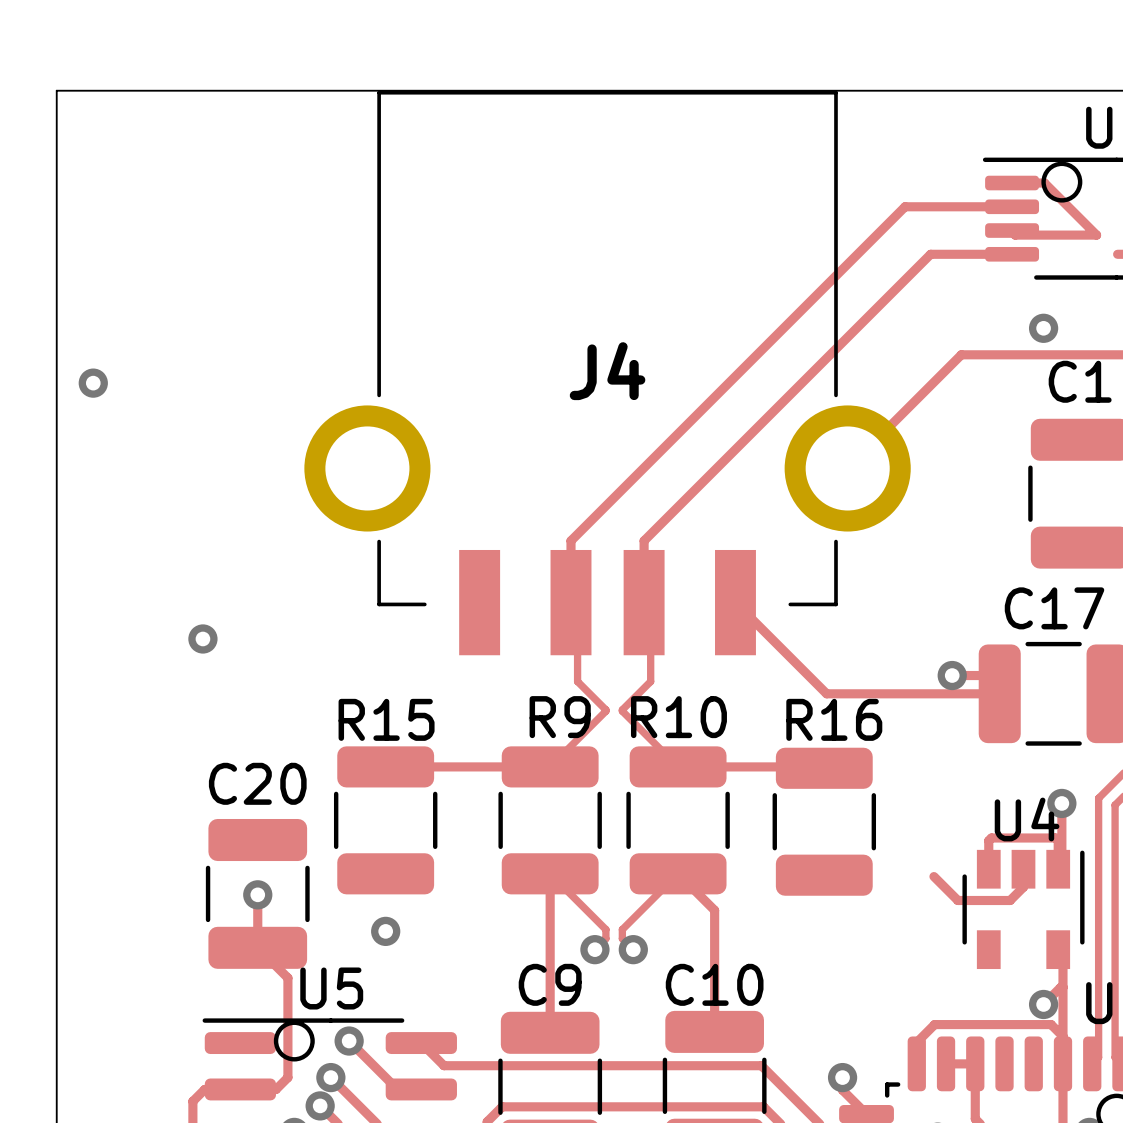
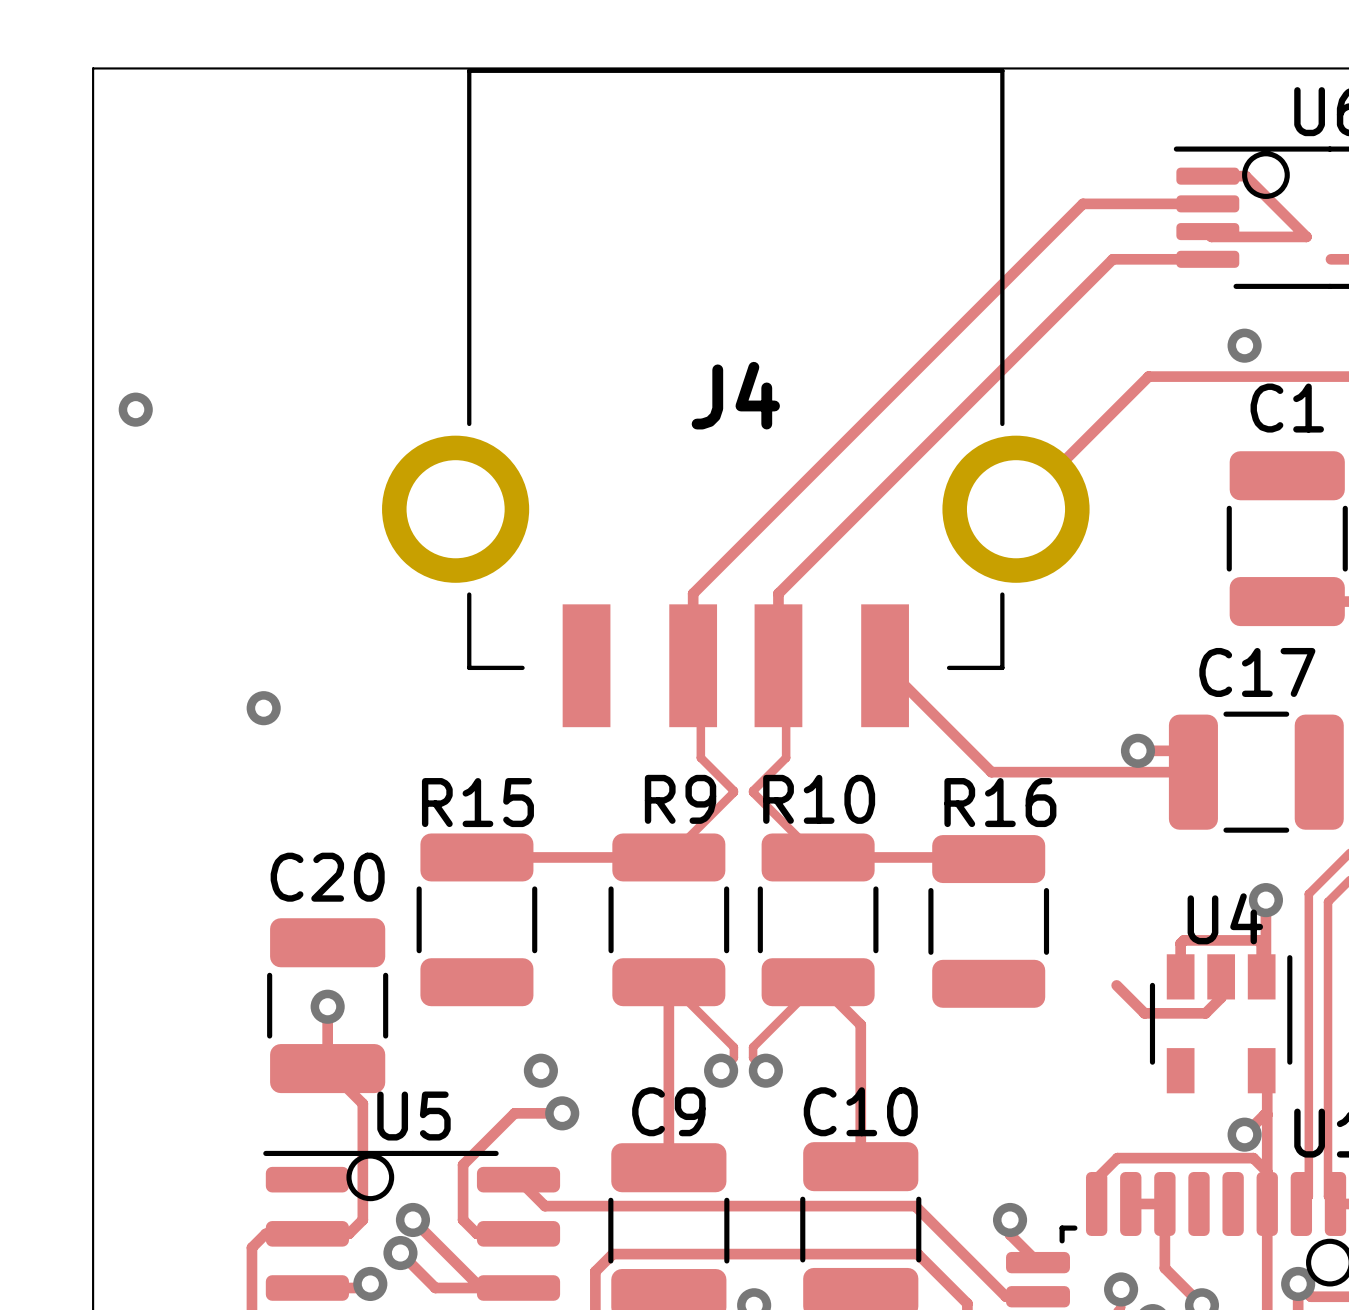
via: (385, 931) -> none
via: none -> (540, 1070)
via: none -> (562, 1113)
track: (349, 1041) (397, 1089) -> (562, 1113) (514, 1113) (463, 1164) (463, 1219) (476, 1233) (490, 1233)
via: (349, 1041) -> none

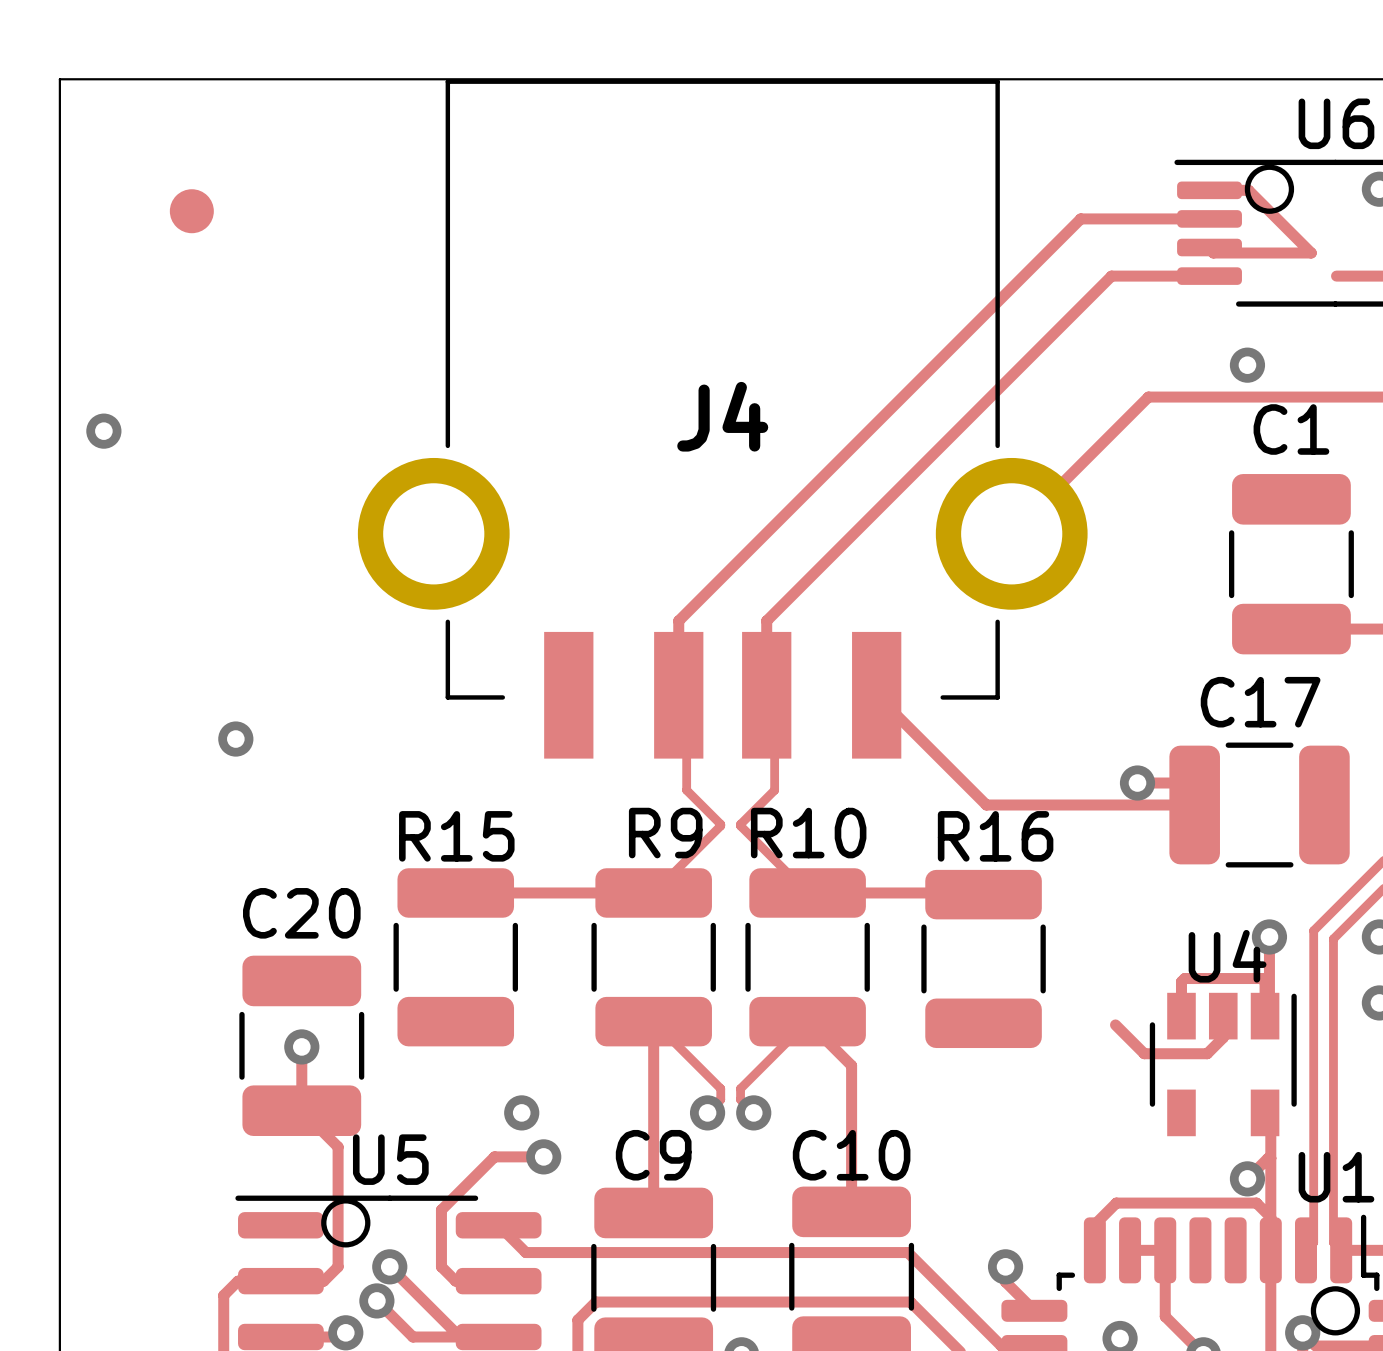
part: none -> (191, 211)

